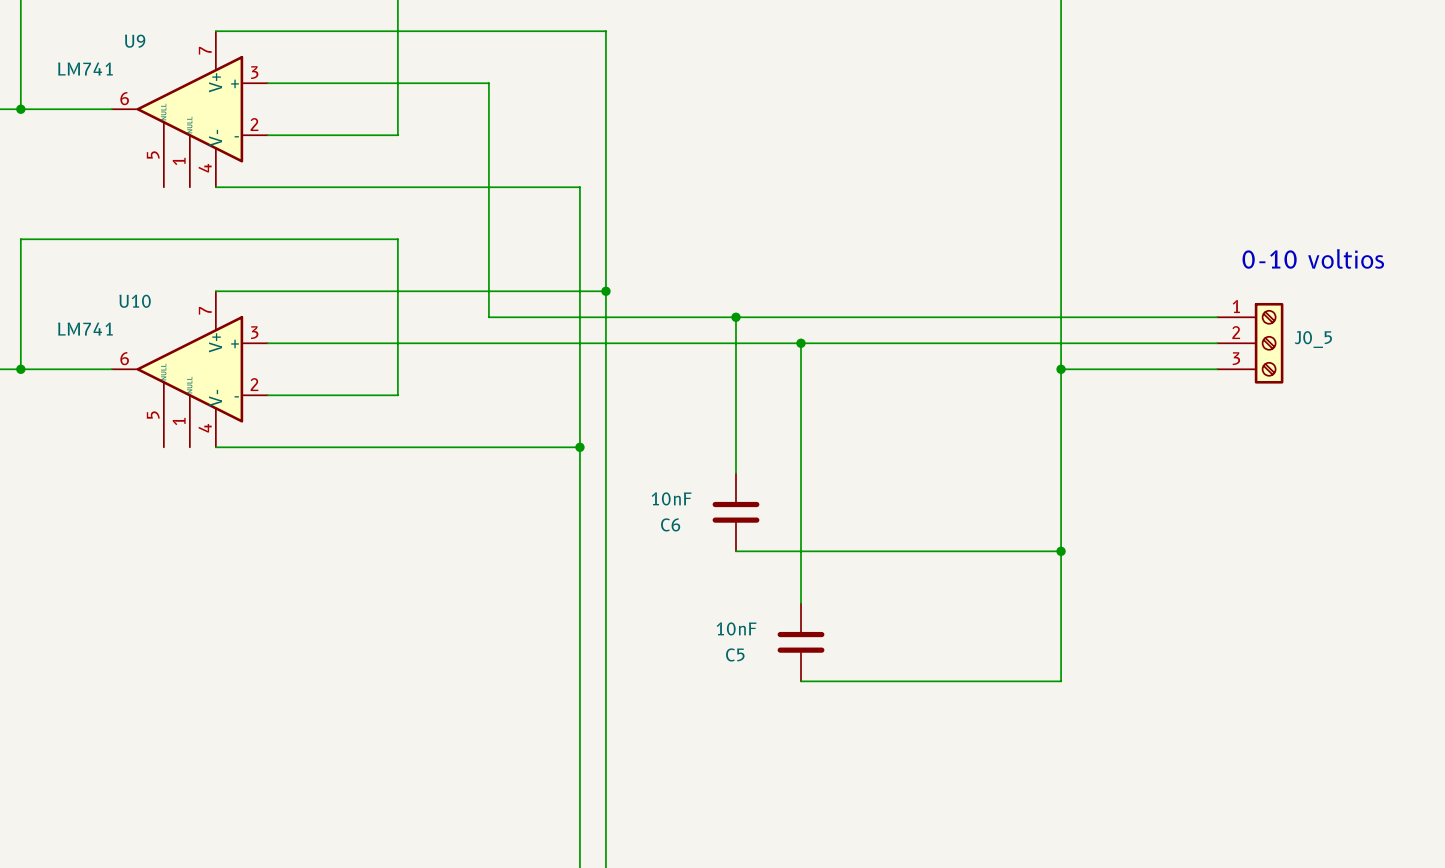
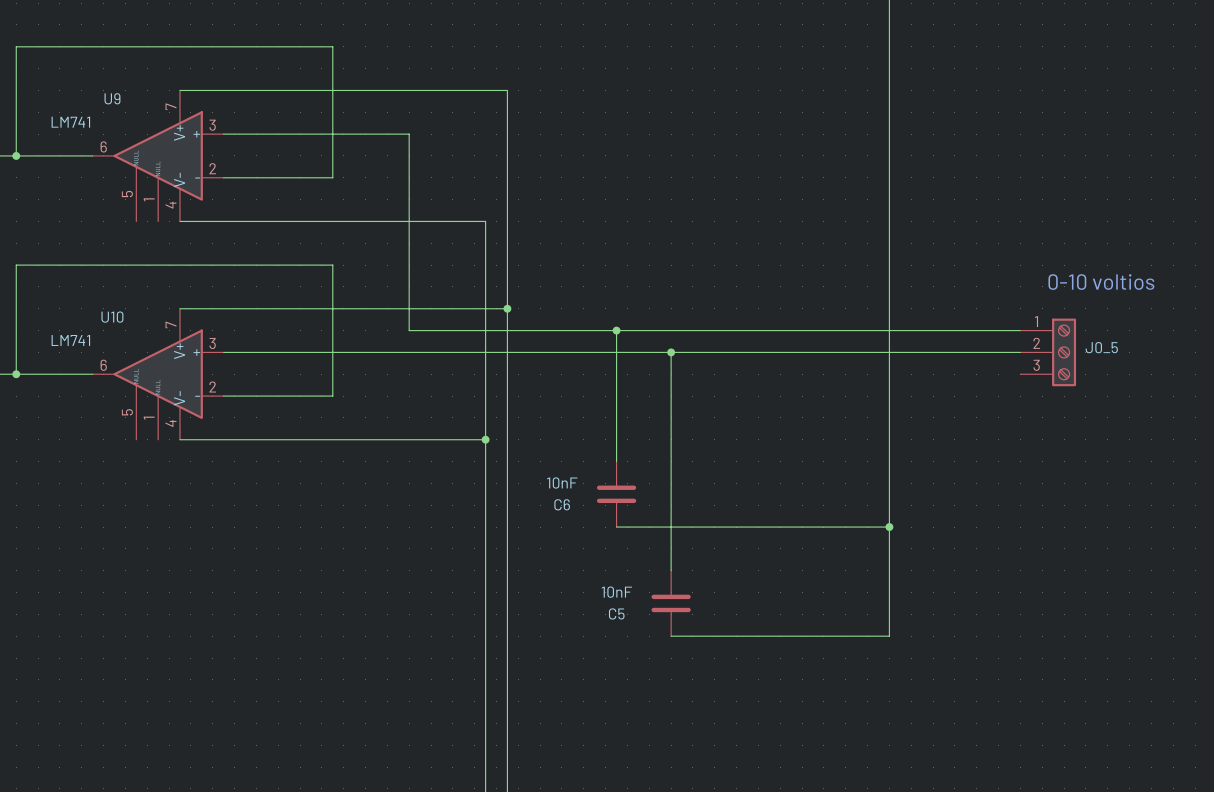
wire: (1061, 369) (1217, 369) -> none
junction: (1061, 369) -> none

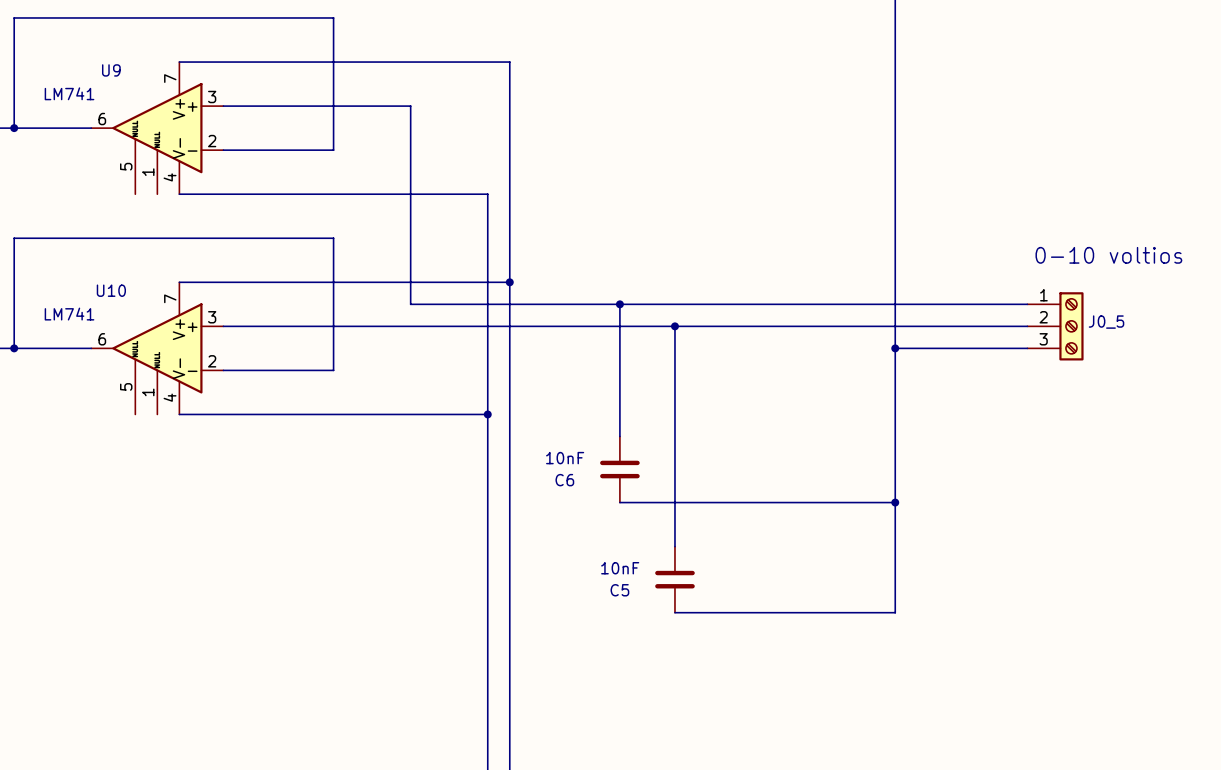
wire: none -> (895, 348) (1027, 348)
junction: none -> (895, 348)

